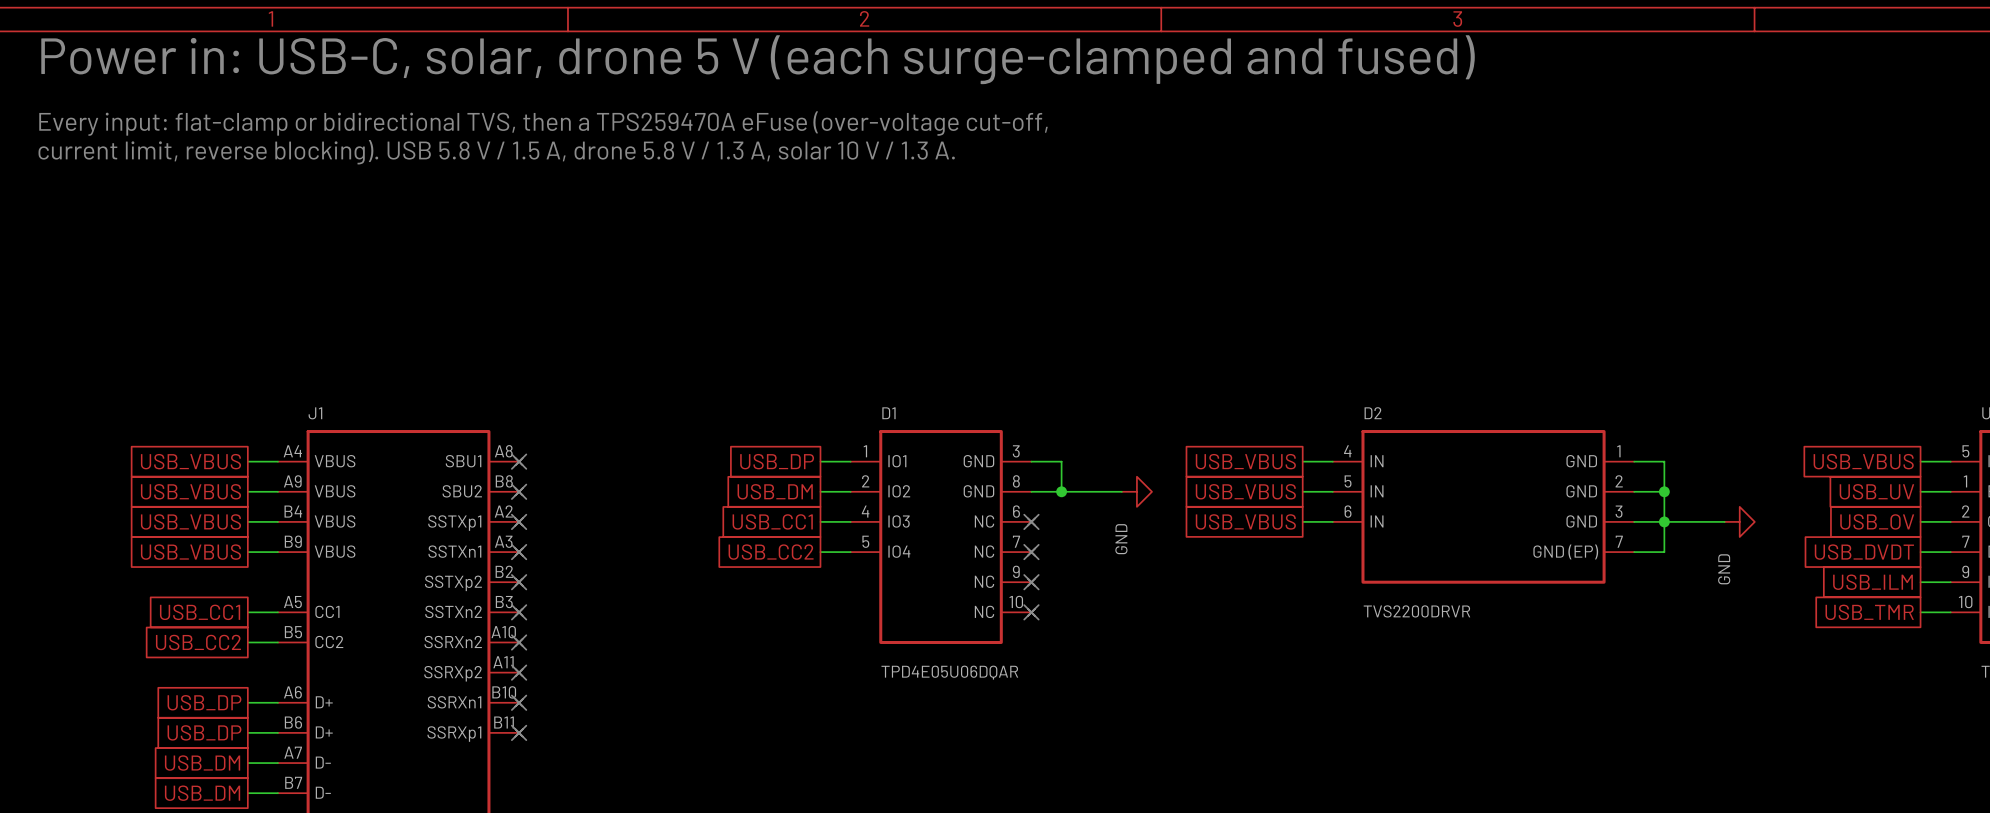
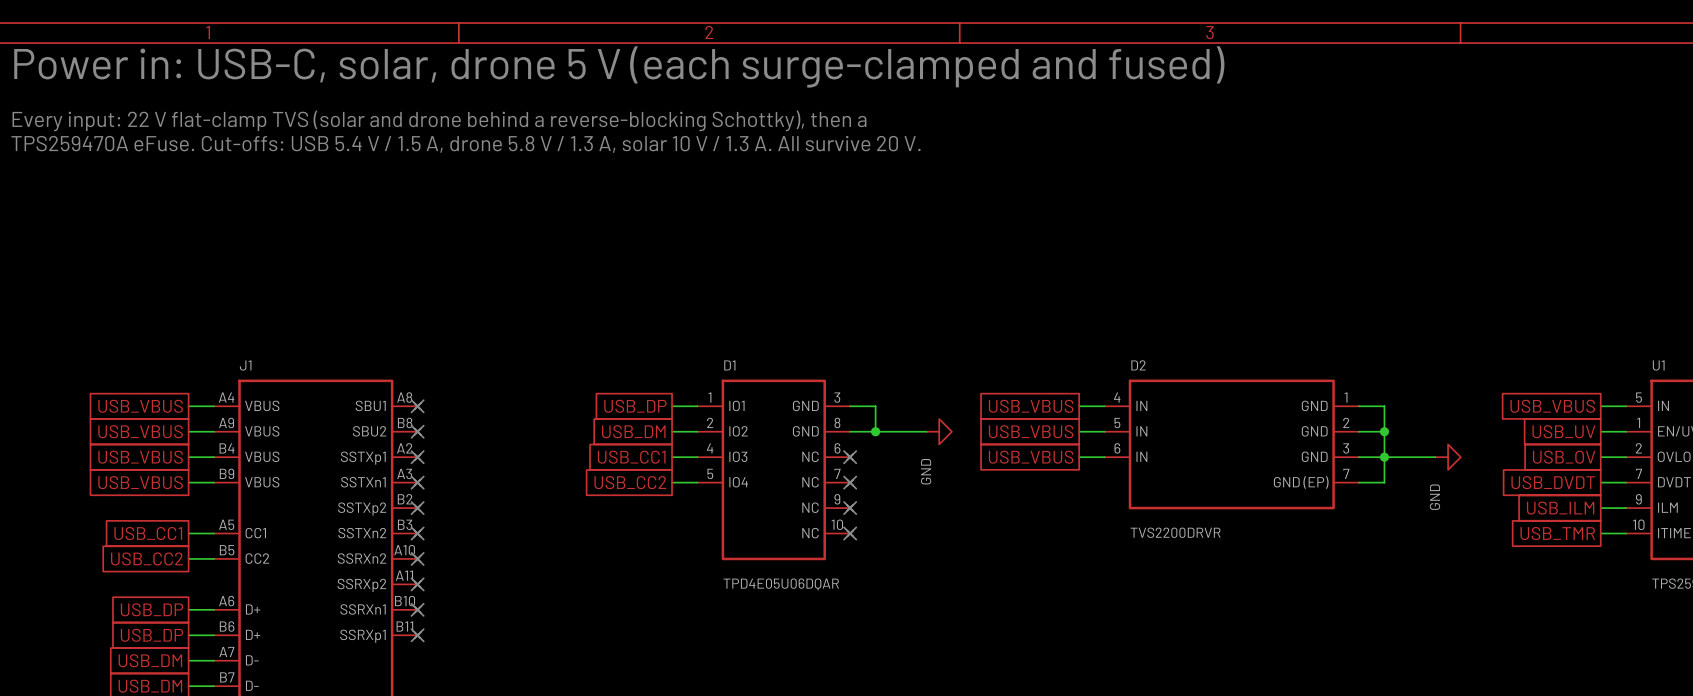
text: Every input: flat-clamp or bidirectional TVS, then a TPS259470A eFuse (over-voltage cut-off, (543, 123) -> Every input: 22 V flat-clamp TVS (solar and drone behind a reverse-blocking Schottky), then a (439, 120)
text: current limit, reverse blocking). USB 5.8 V / 1.5 A, drone 5.8 V / 1.3 A, solar 10 V / 1.3 A. (496, 152) -> TPS259470A eFuse. Cut-offs: USB 5.4 V / 1.5 A, drone 5.8 V / 1.3 A, solar 10 V / 1.3 A. All survive 20 V. (466, 144)

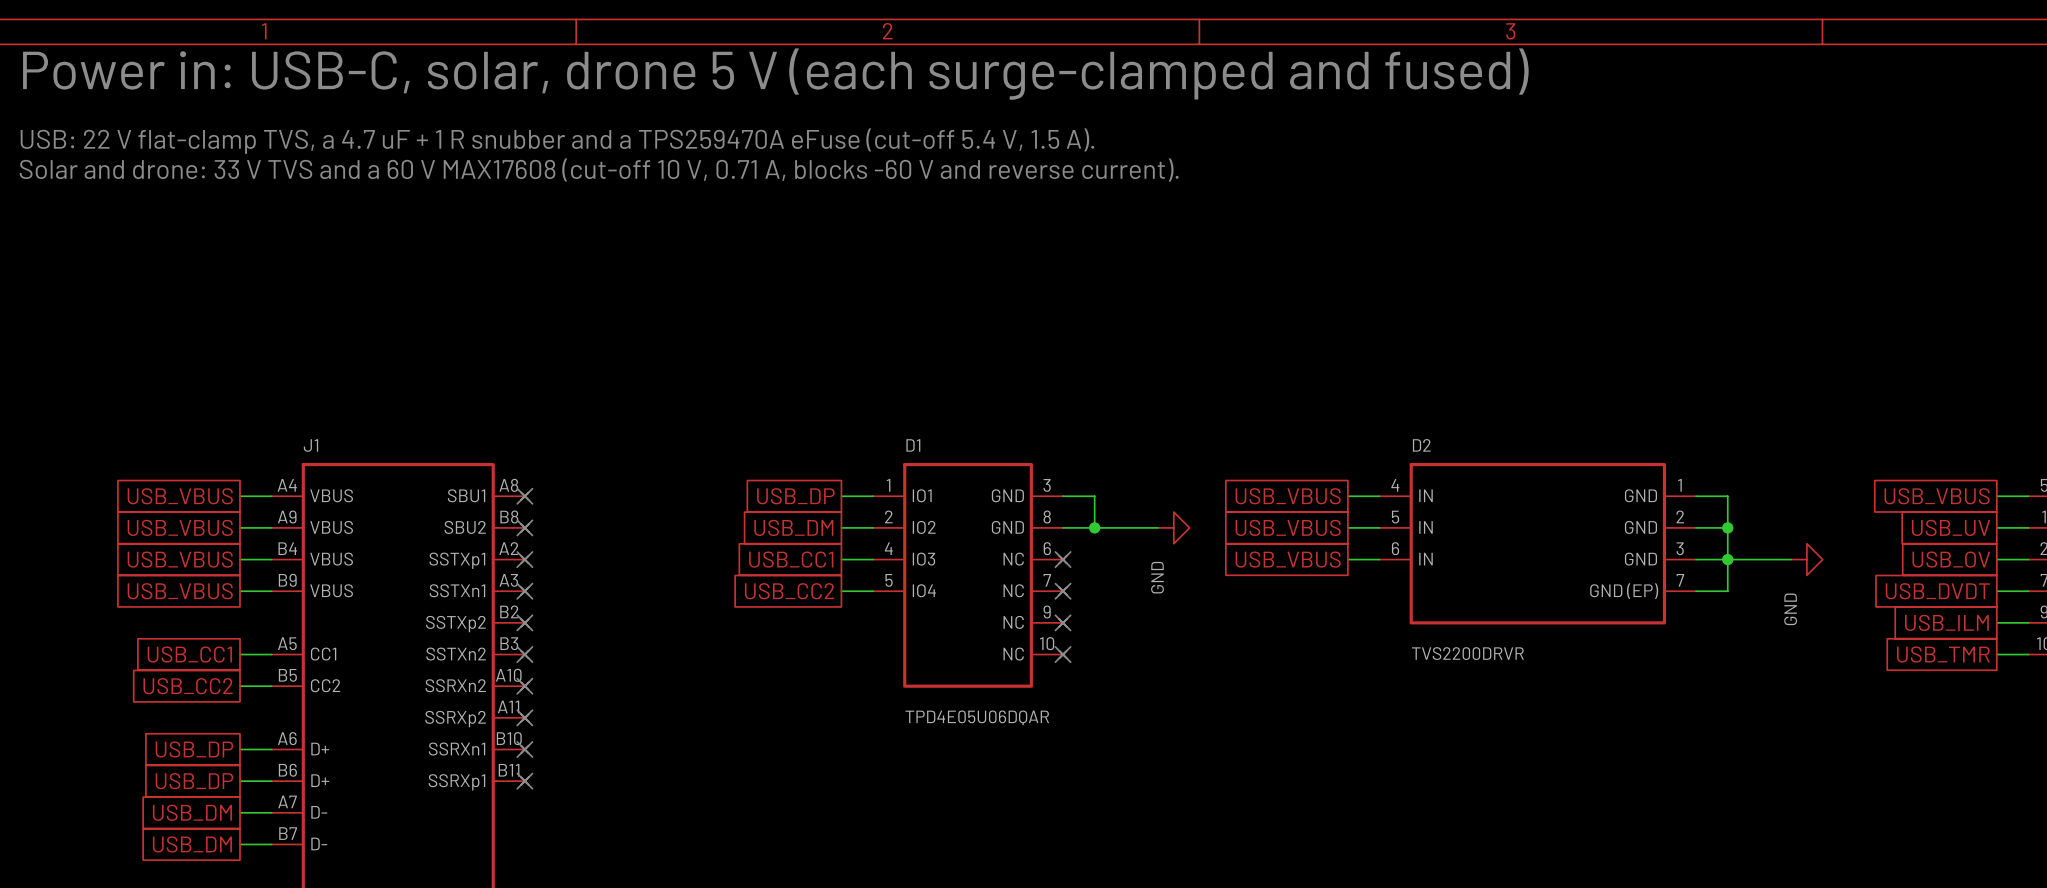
text: Every input: 22 V flat-clamp TVS (solar and drone behind a reverse-blocking Schottky), then a (439, 120) -> USB: 22 V flat-clamp TVS, a 4.7 uF + 1 R snubber and a TPS259470A eFuse (cut-off 5.4 V, 1.5 A). (557, 141)
text: TPS259470A eFuse. Cut-offs: USB 5.4 V / 1.5 A, drone 5.8 V / 1.3 A, solar 10 V / 1.3 A. All survive 20 V. (466, 144) -> Solar and drone: 33 V TVS and a 60 V MAX17608 (cut-off 10 V, 0.71 A, blocks -60 V and reverse current). (599, 169)

